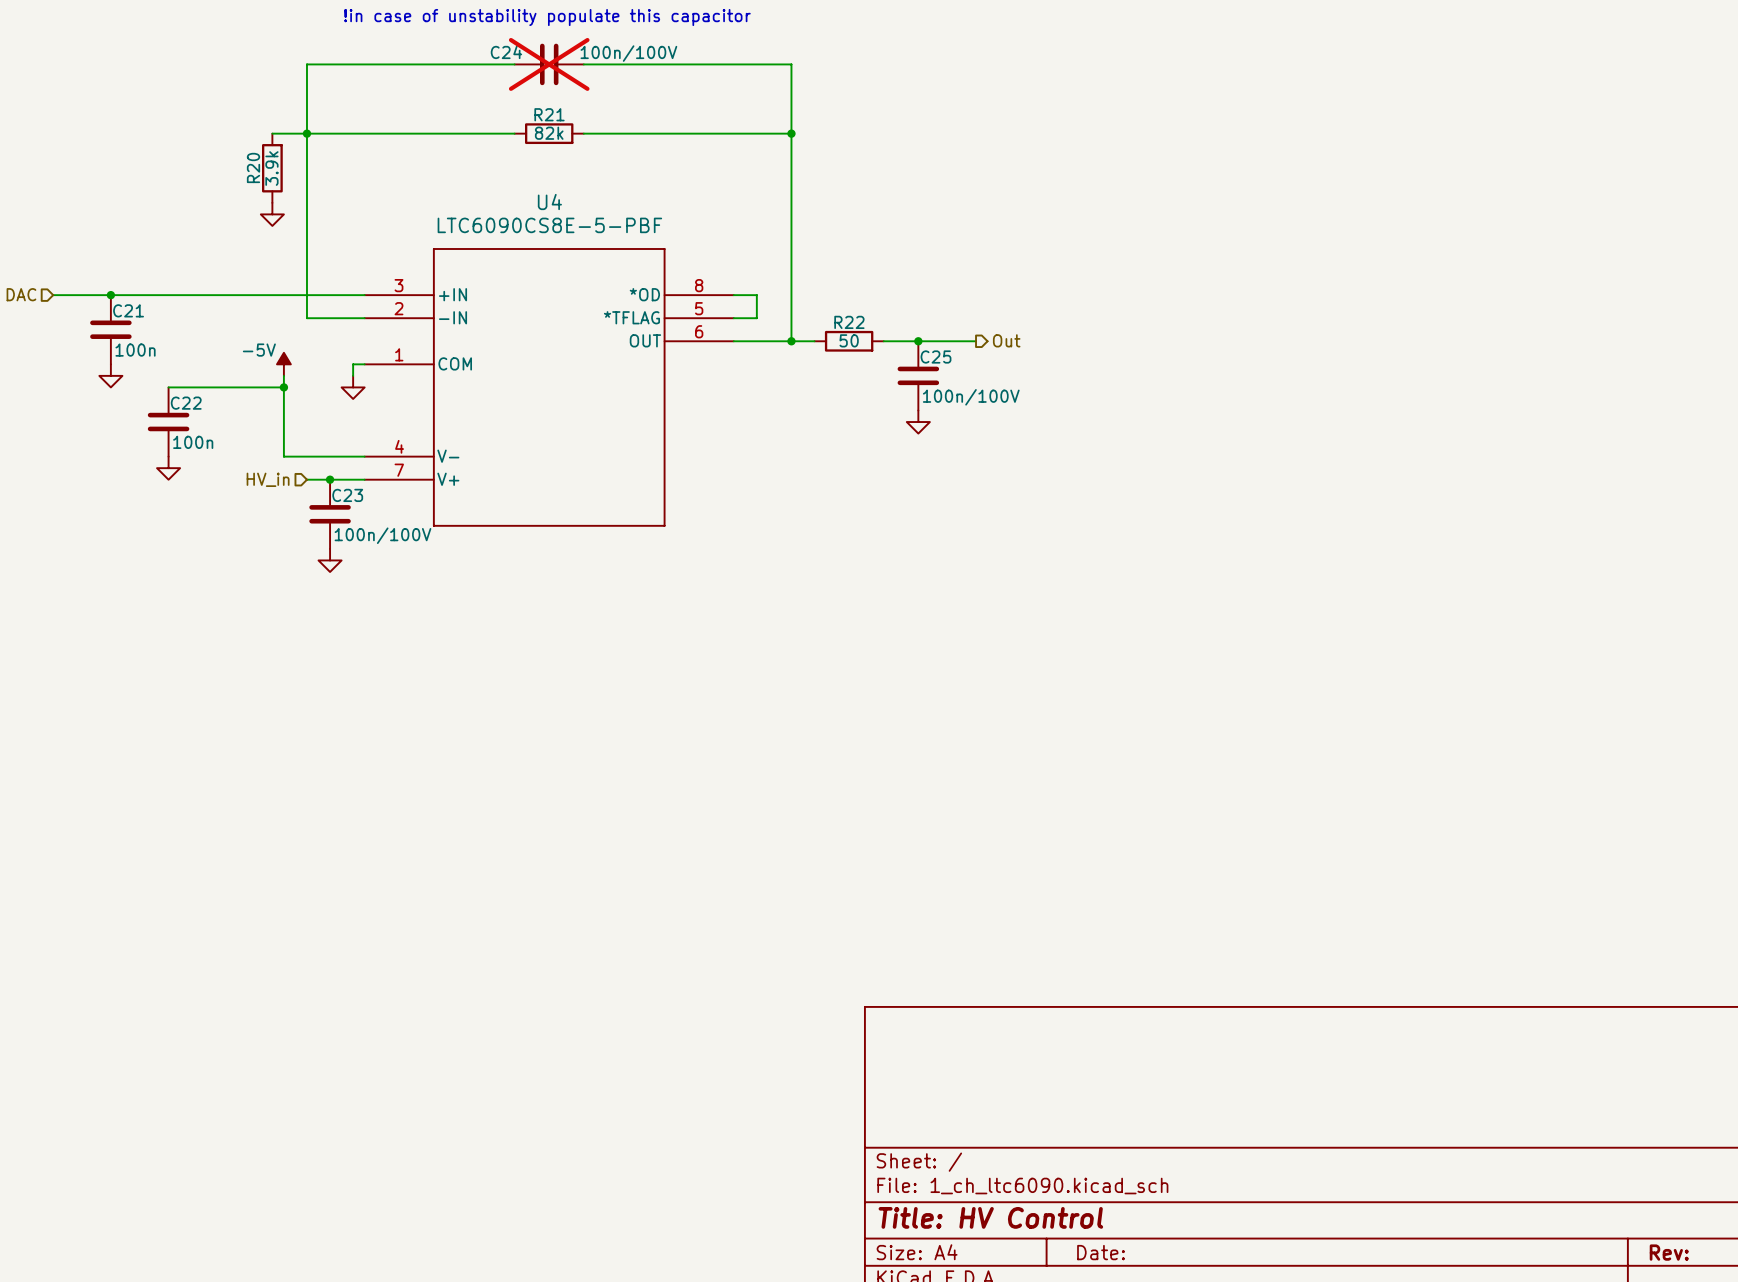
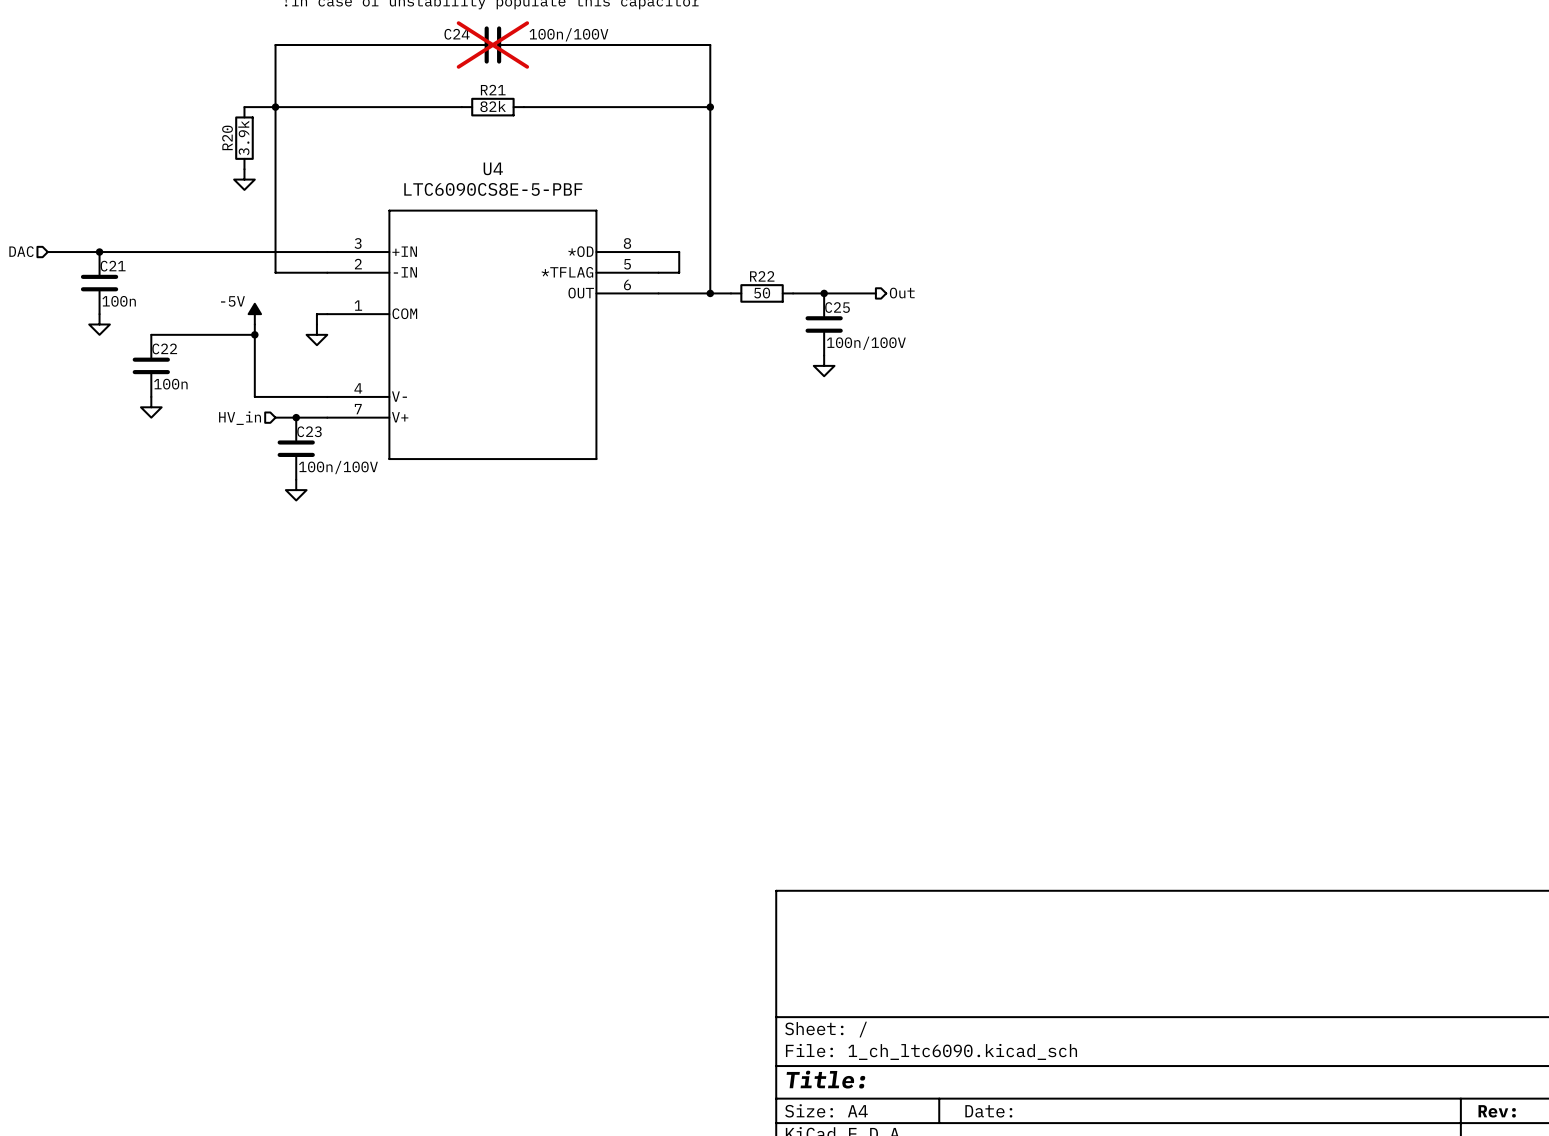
title block: Title: HV Control (990, 1217) -> Title: (825, 1079)

